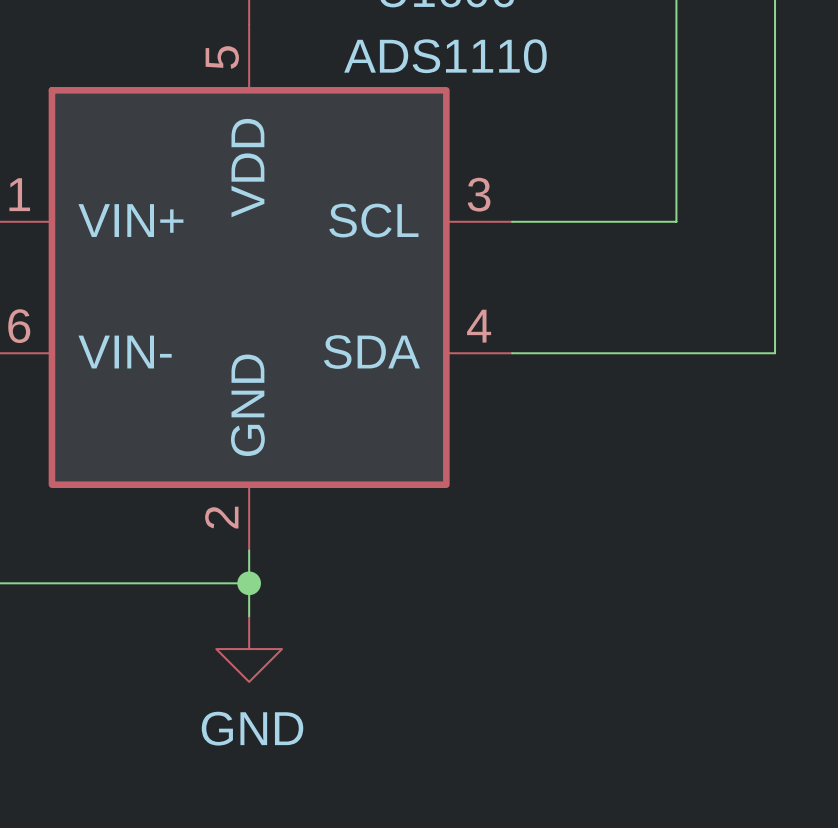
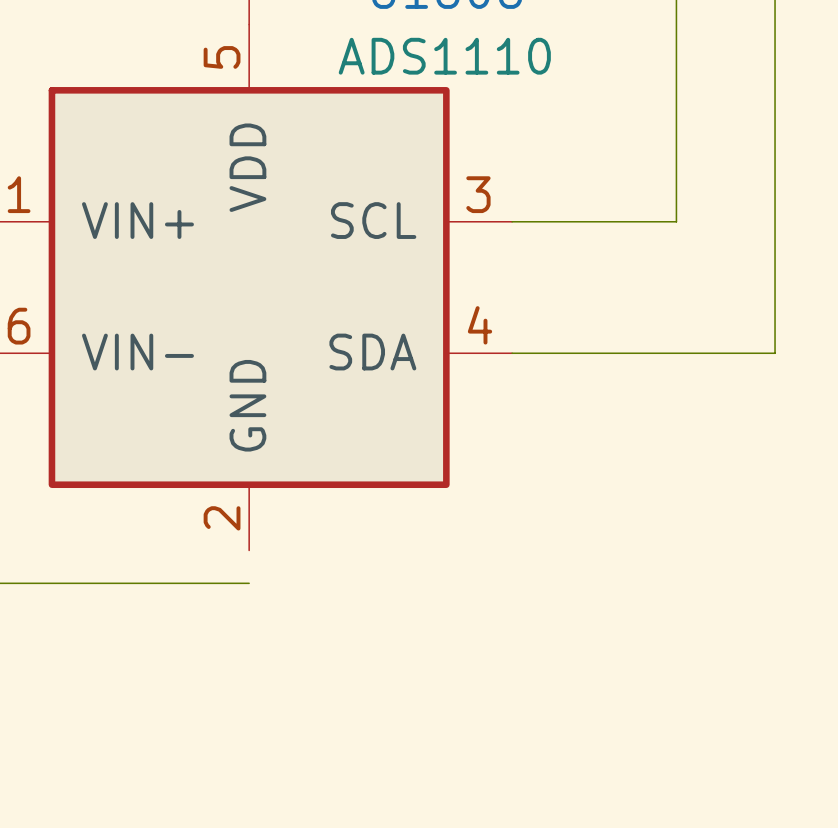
wire: (249, 550) (249, 616) -> none
junction: (249, 583) -> none
power symbol: GND (249, 649) -> none

